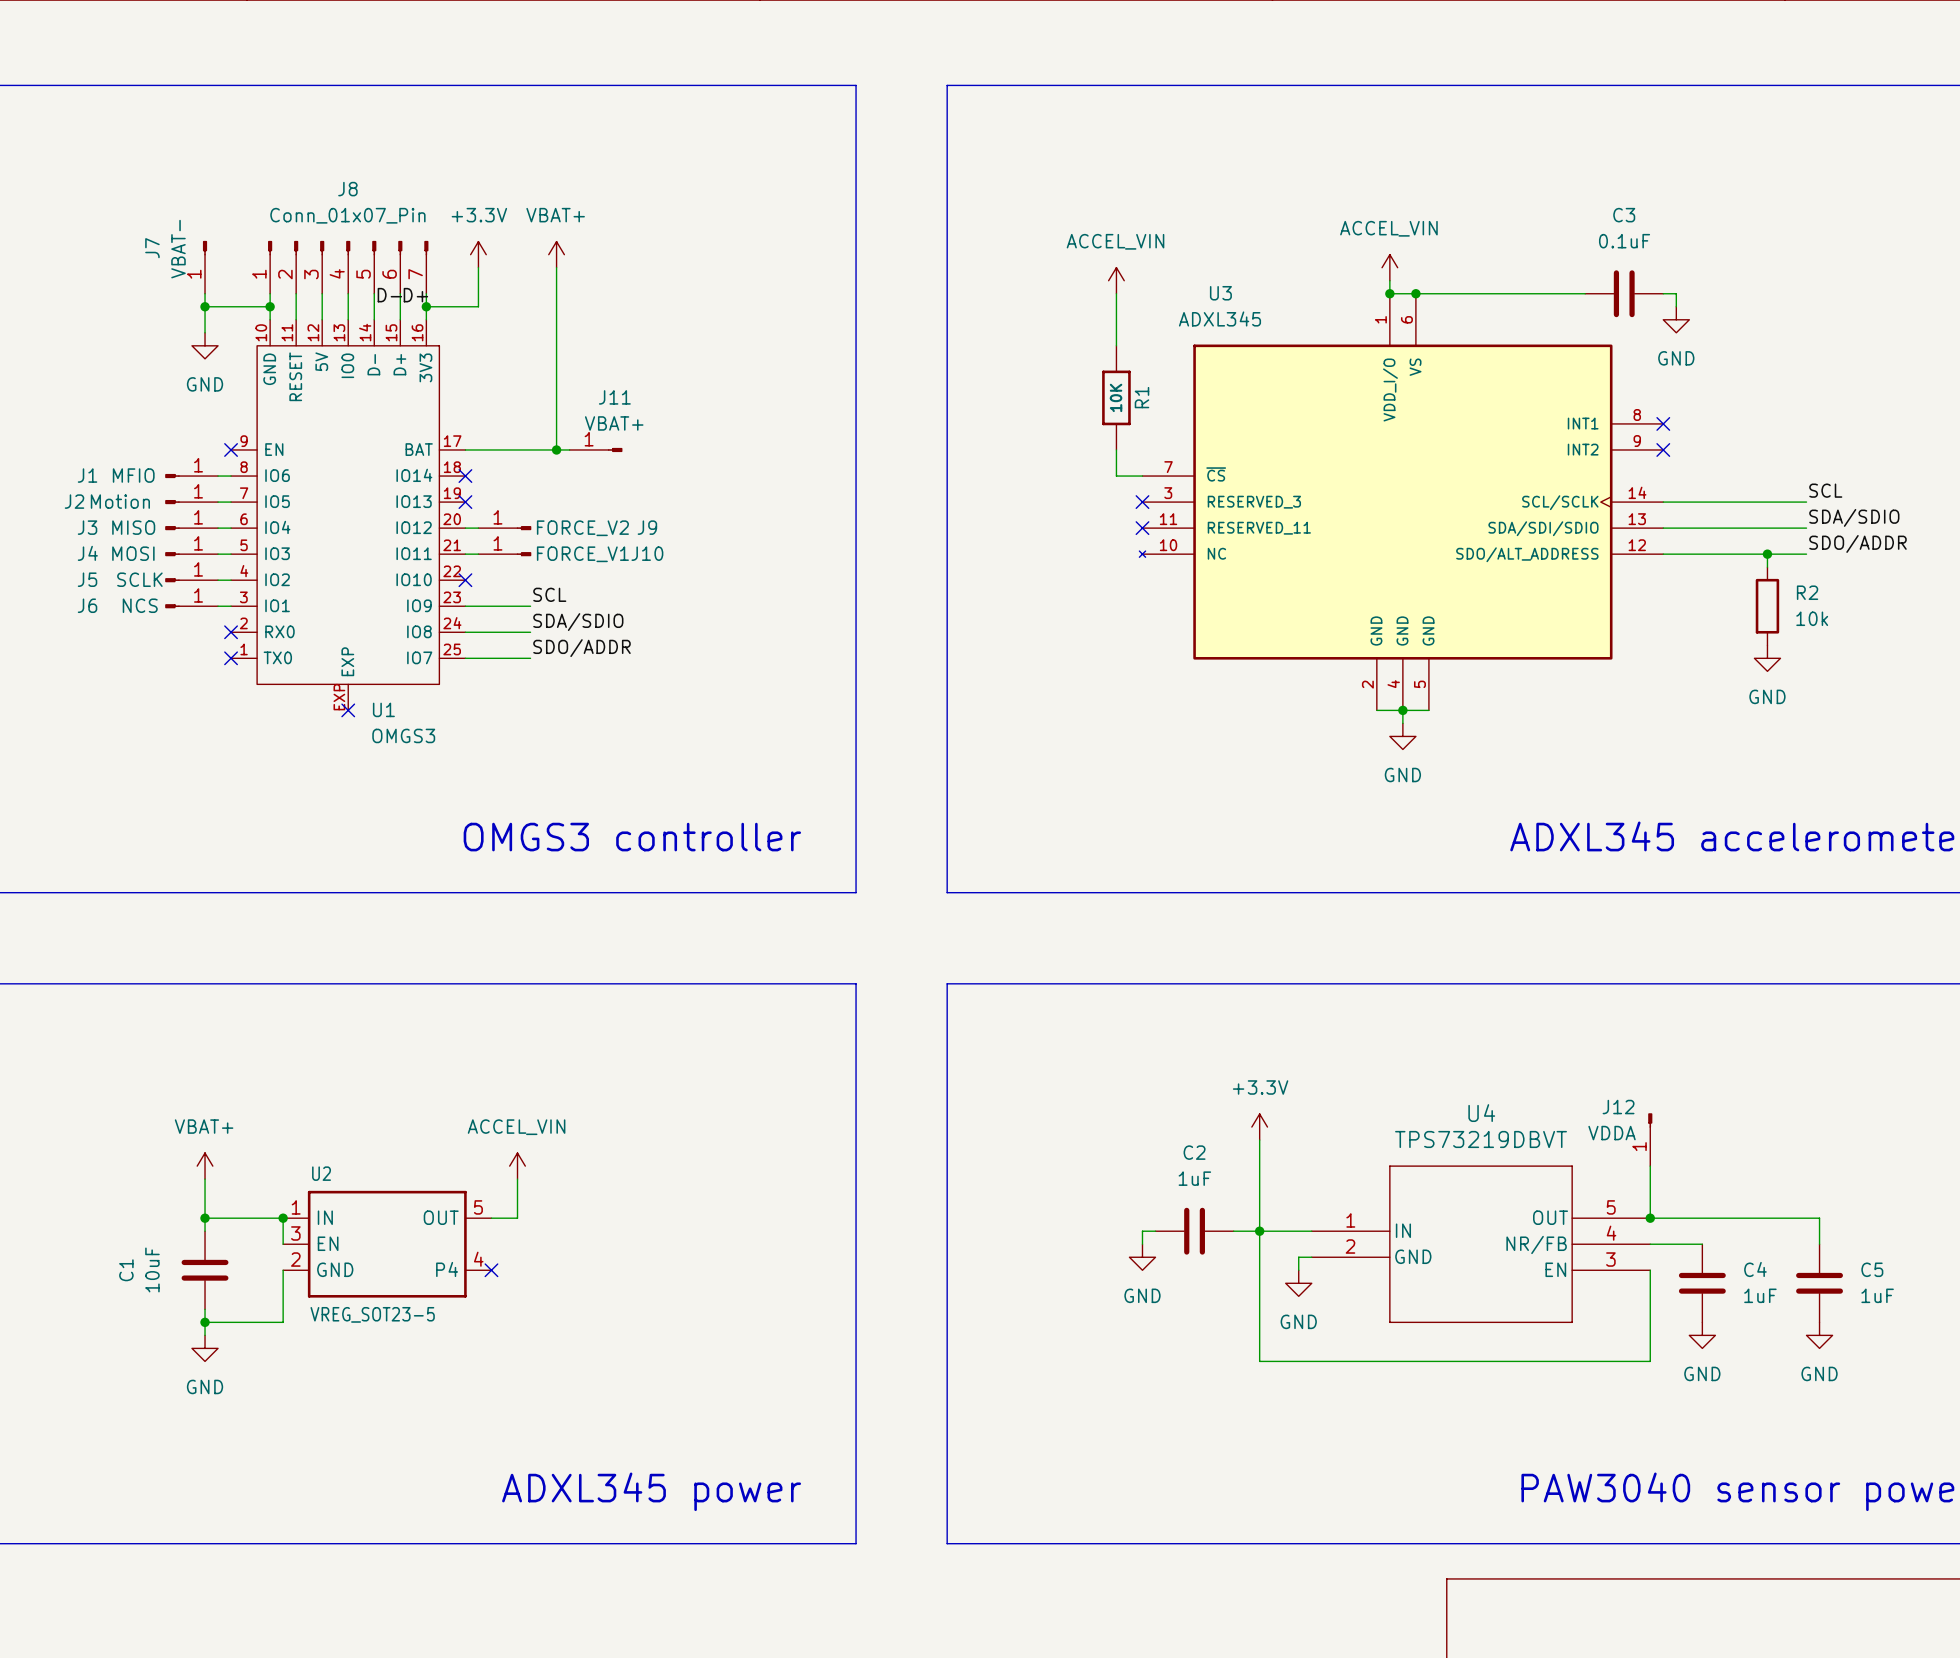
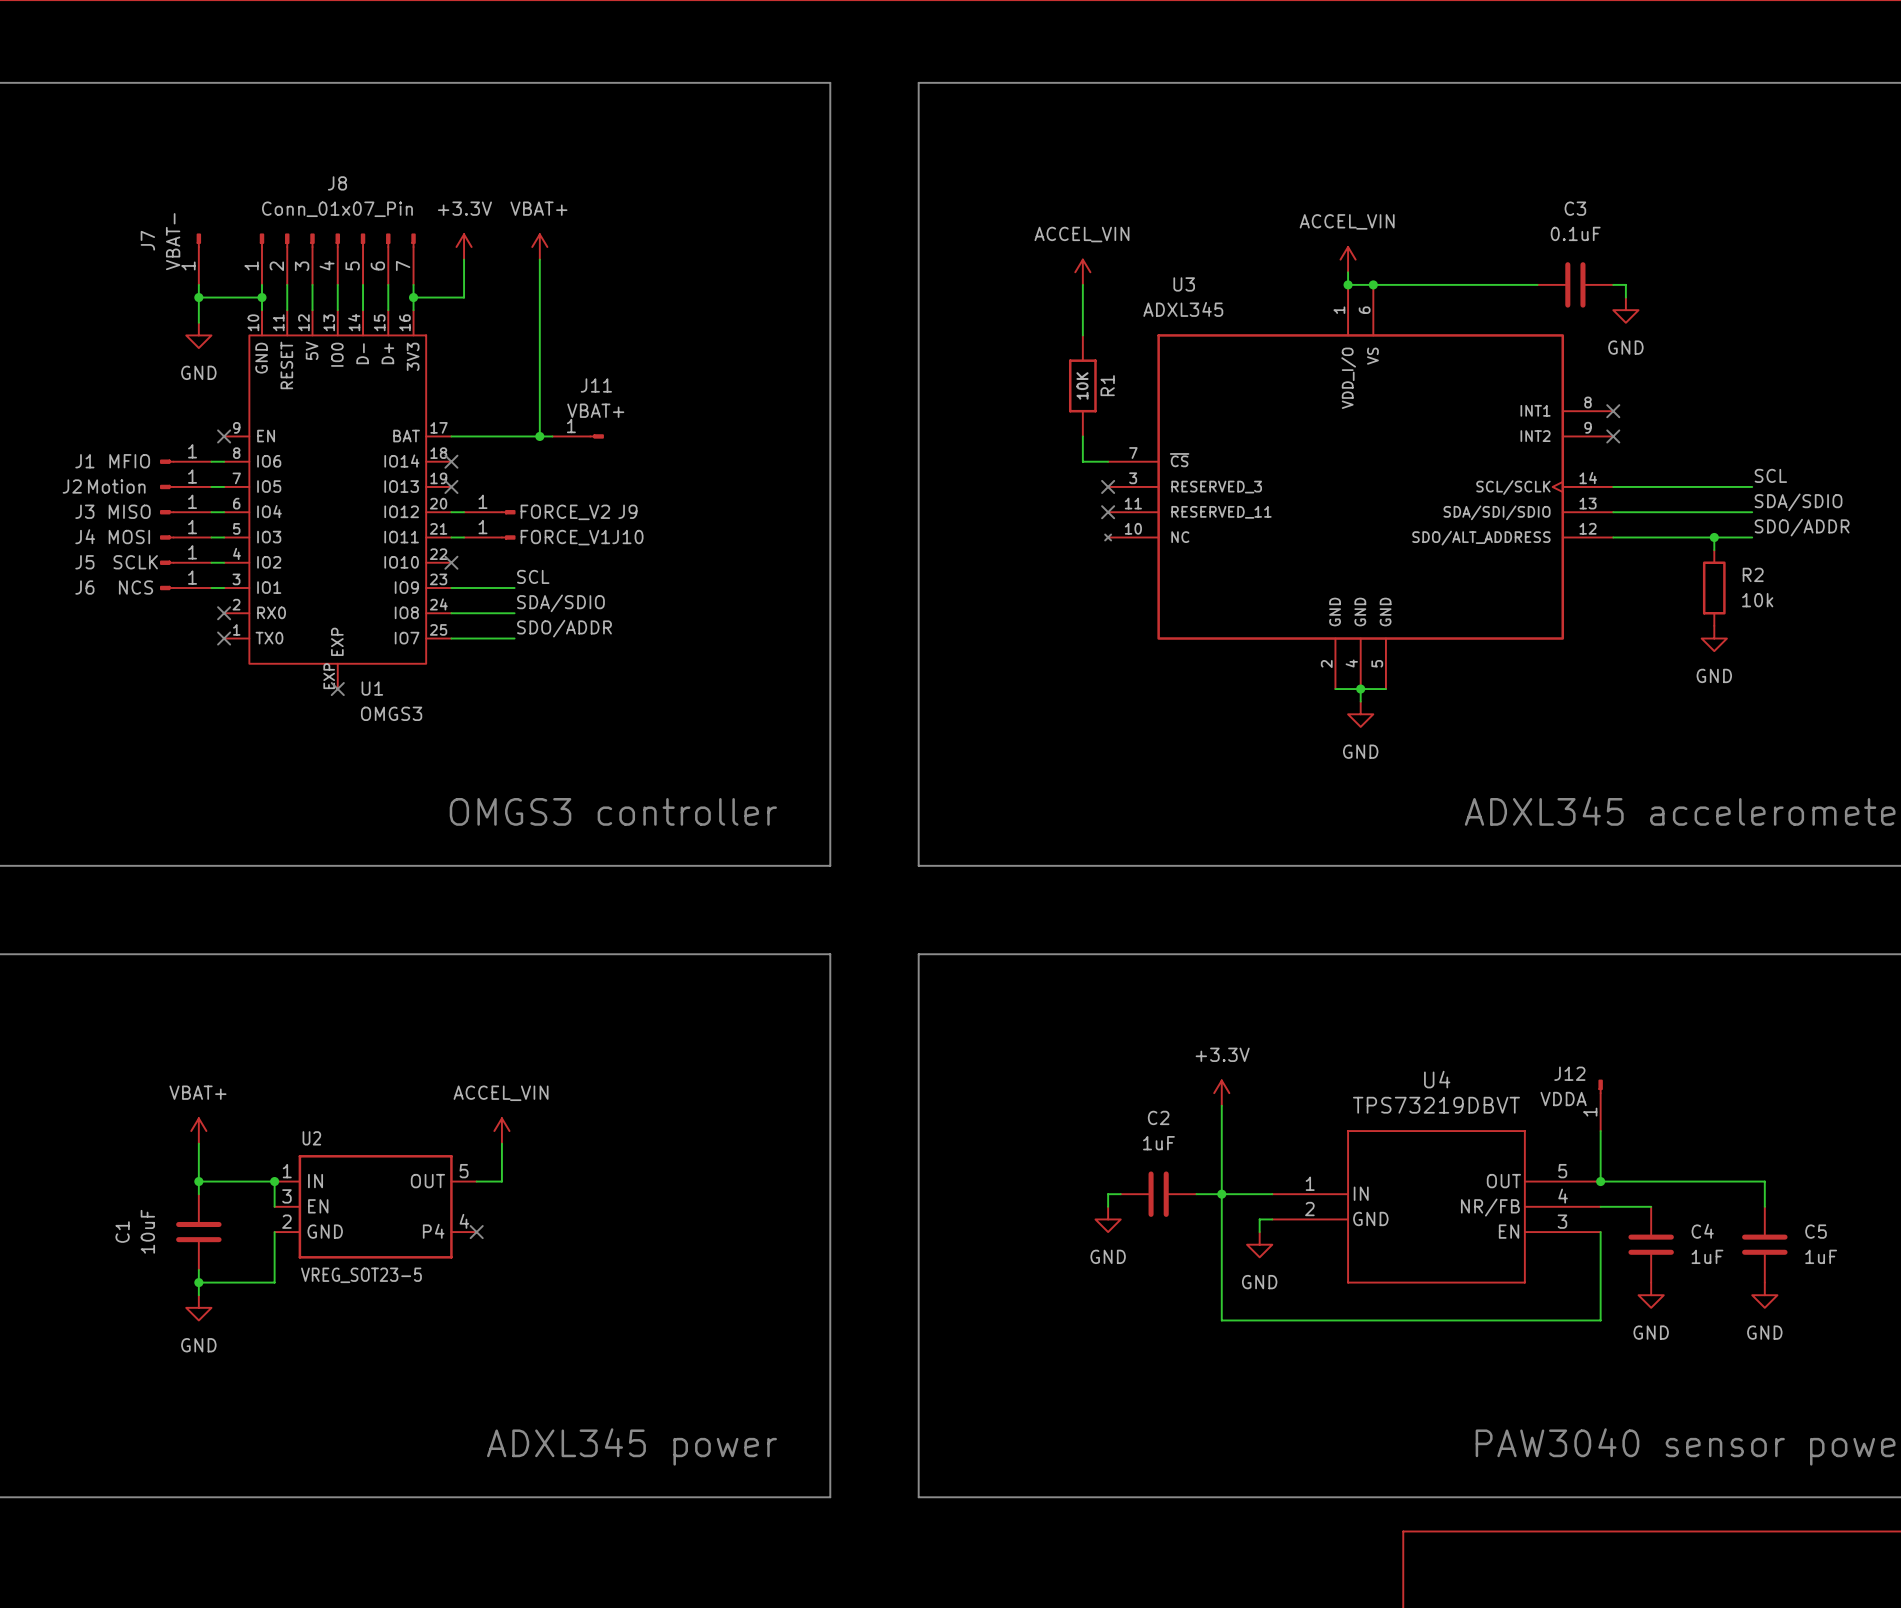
label: D- (389, 295) -> none
label: D+ (415, 295) -> none

